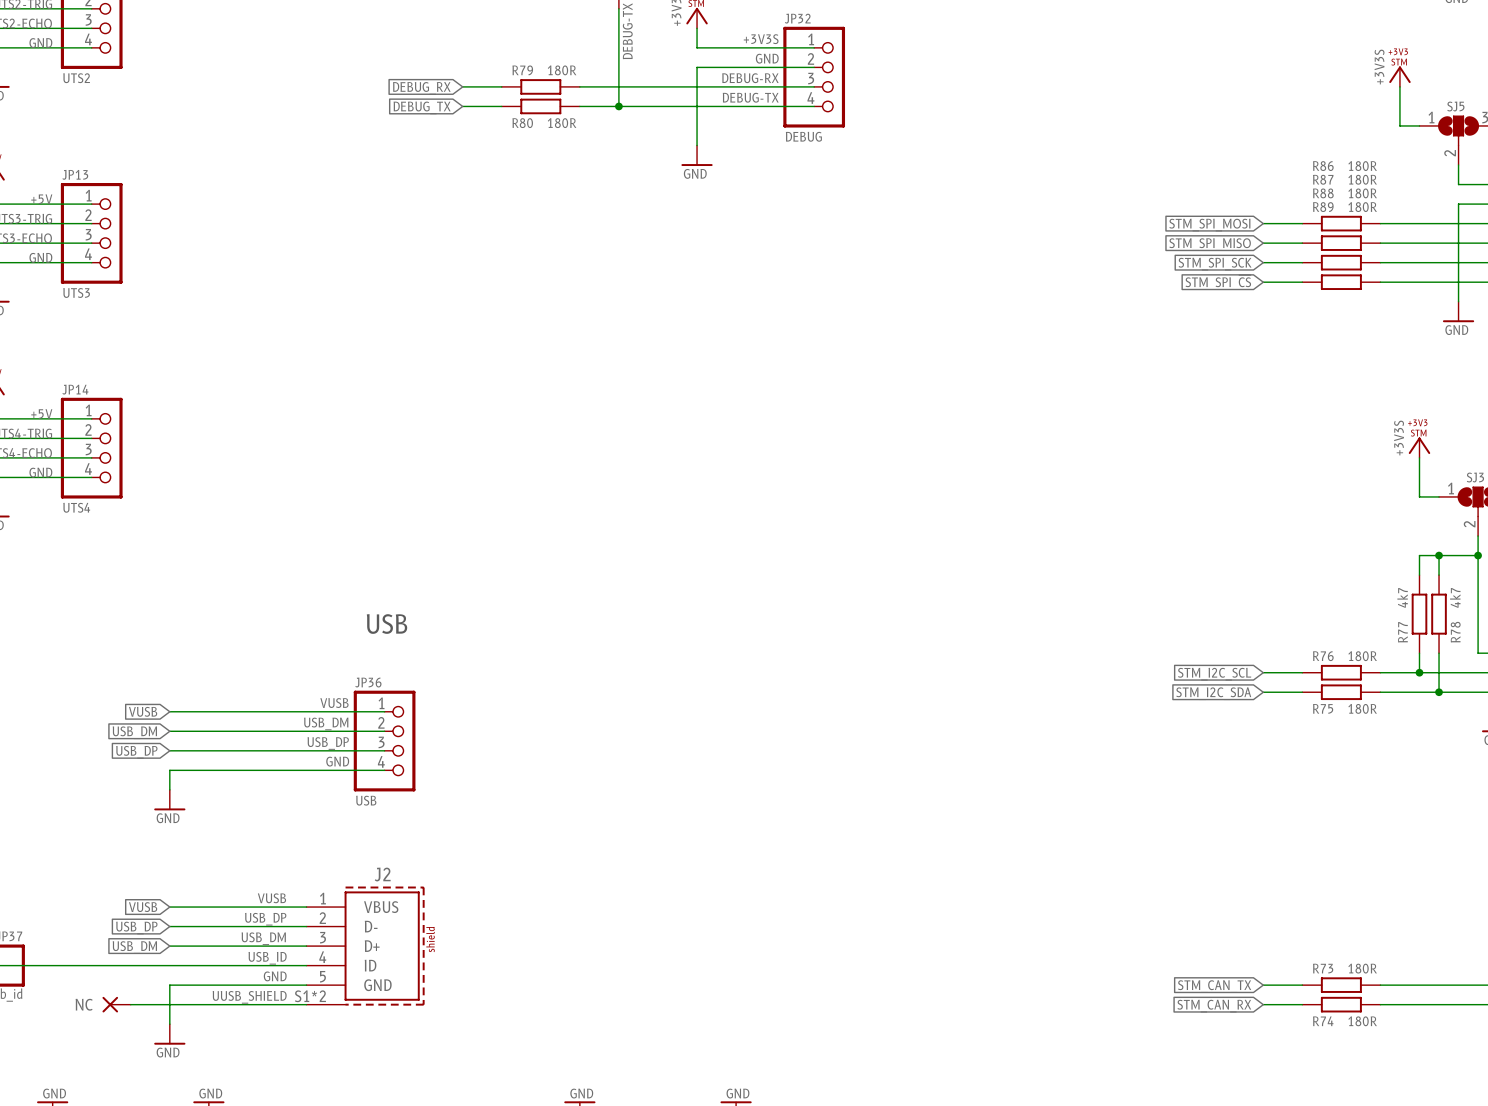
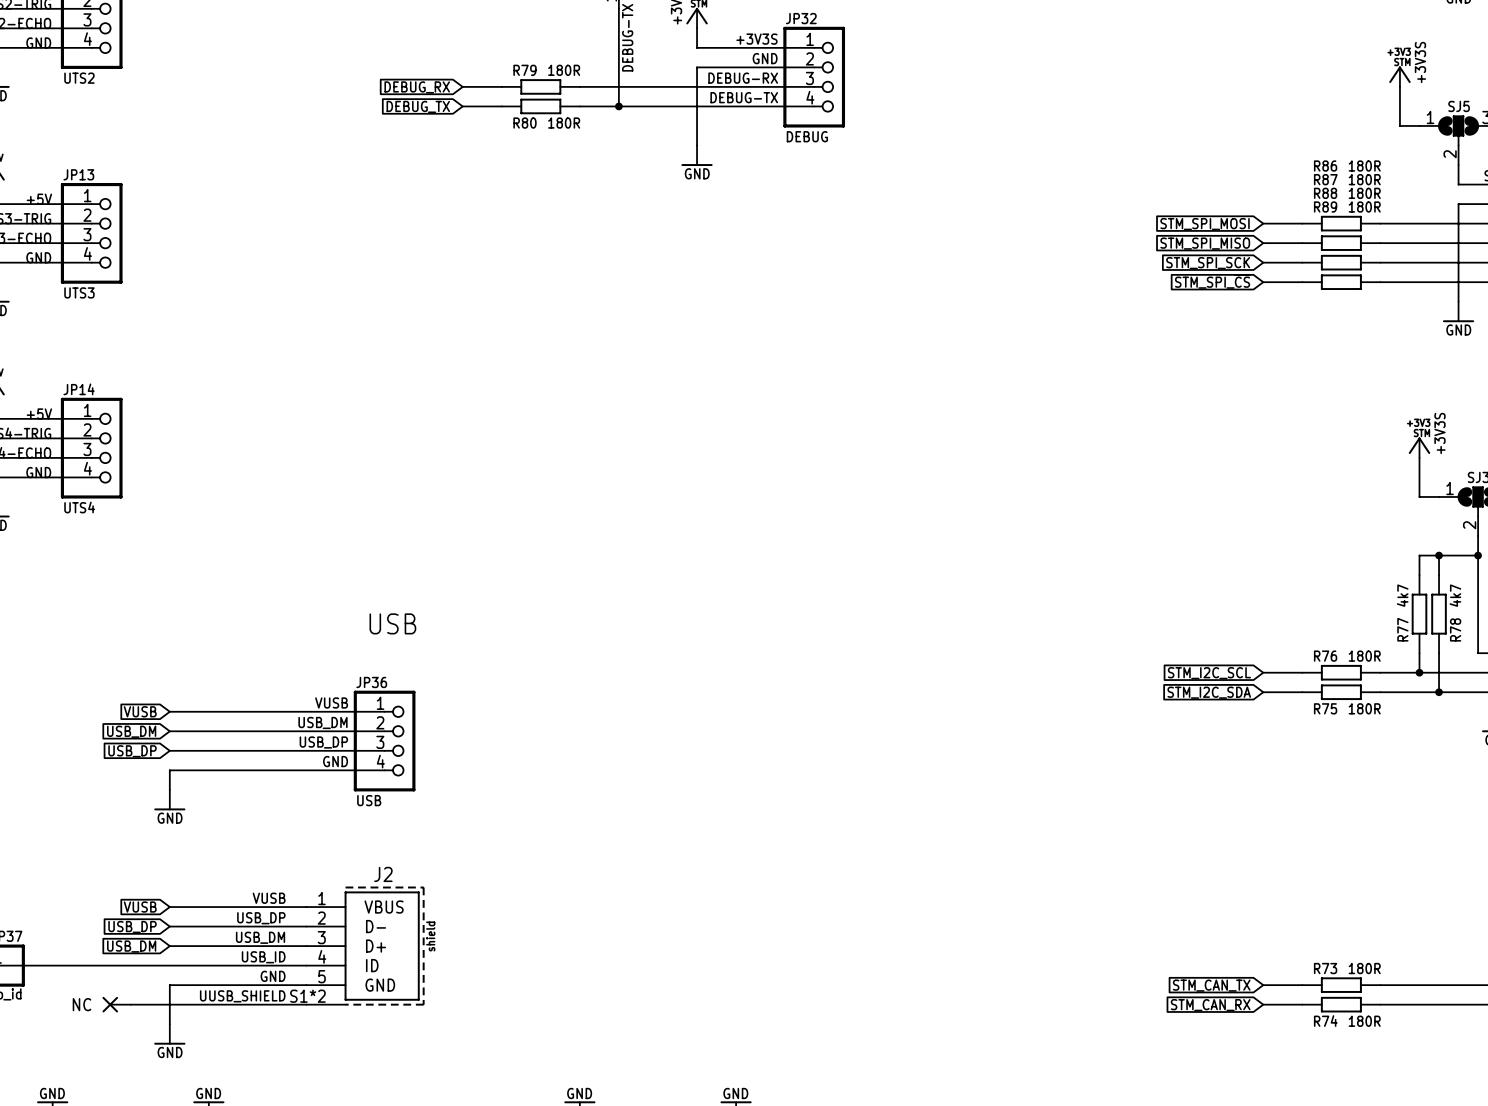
power symbol flip: as is (1399, 74) -> left-right (1399, 74)
power symbol flip: as is (1419, 445) -> left-right (1419, 445)

